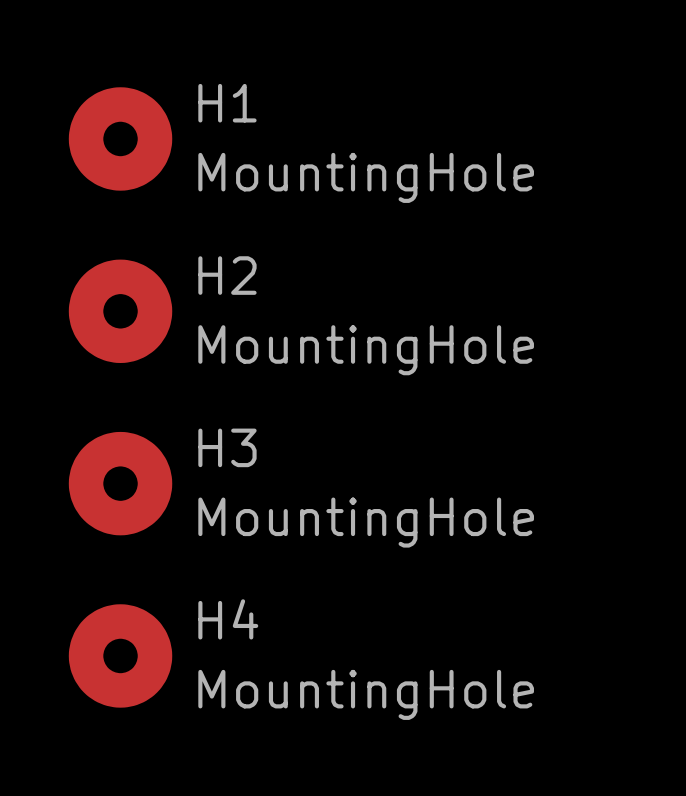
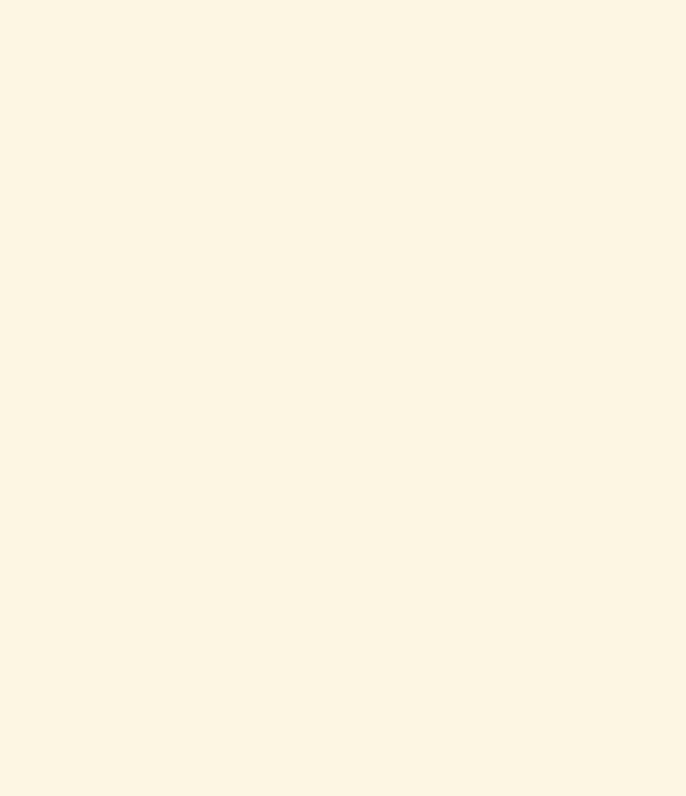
H1: MountingHole (120, 138) -> none
H2: MountingHole (120, 311) -> none
H3: MountingHole (120, 483) -> none
H4: MountingHole (120, 655) -> none

